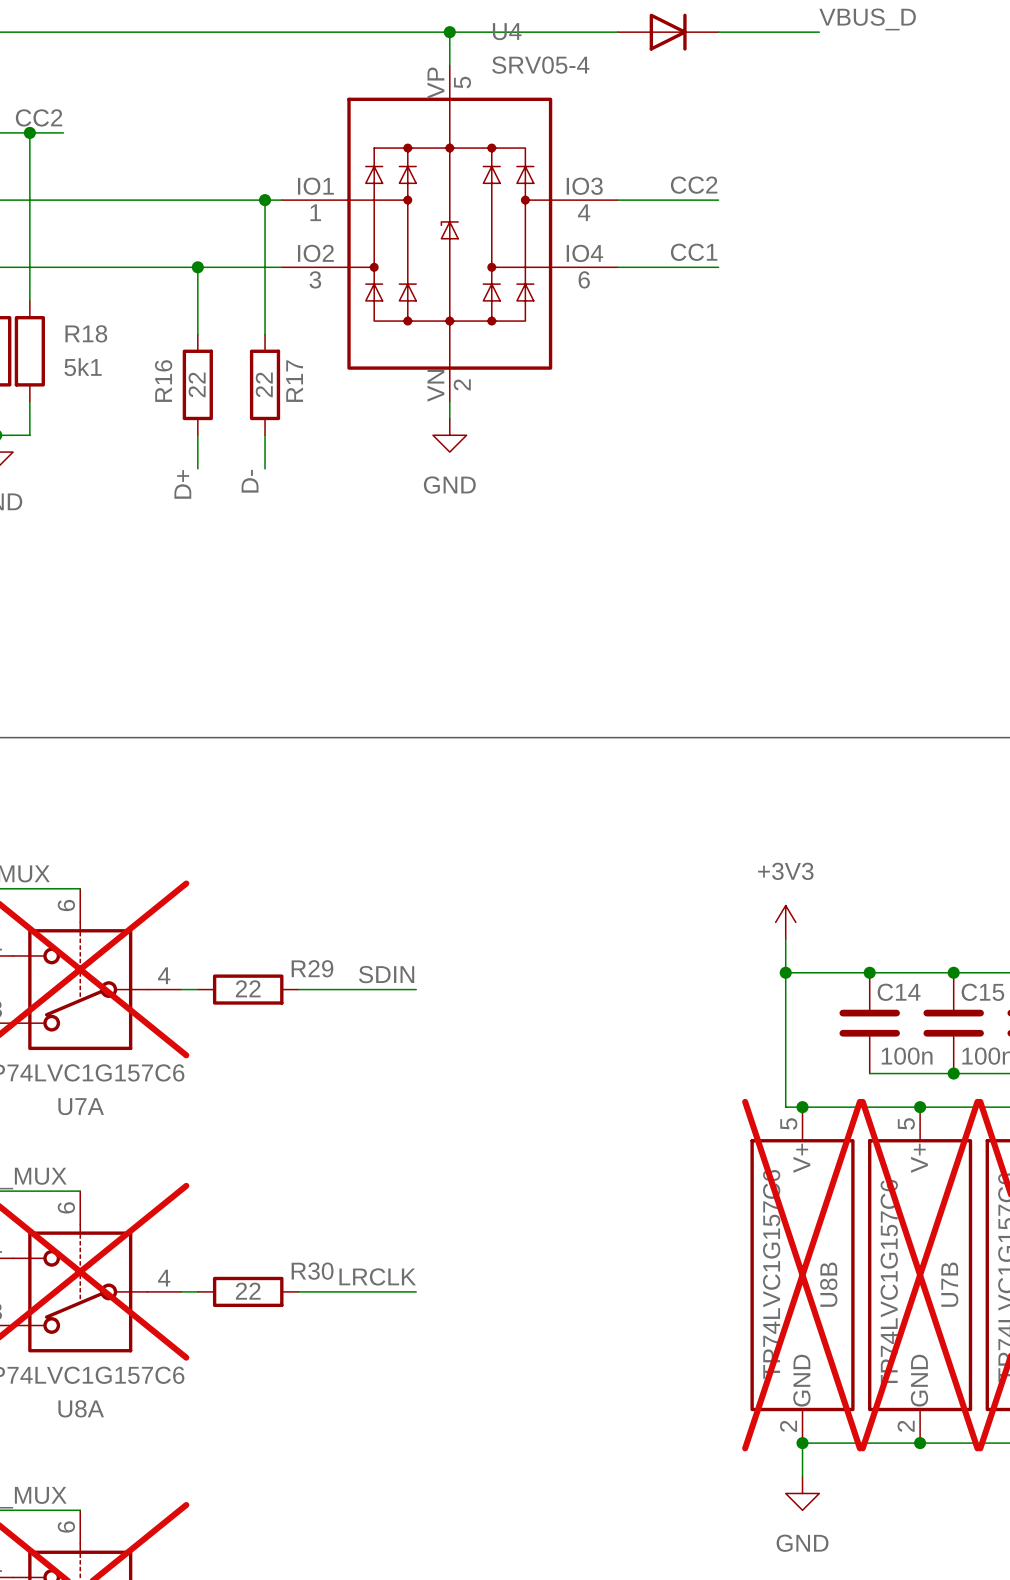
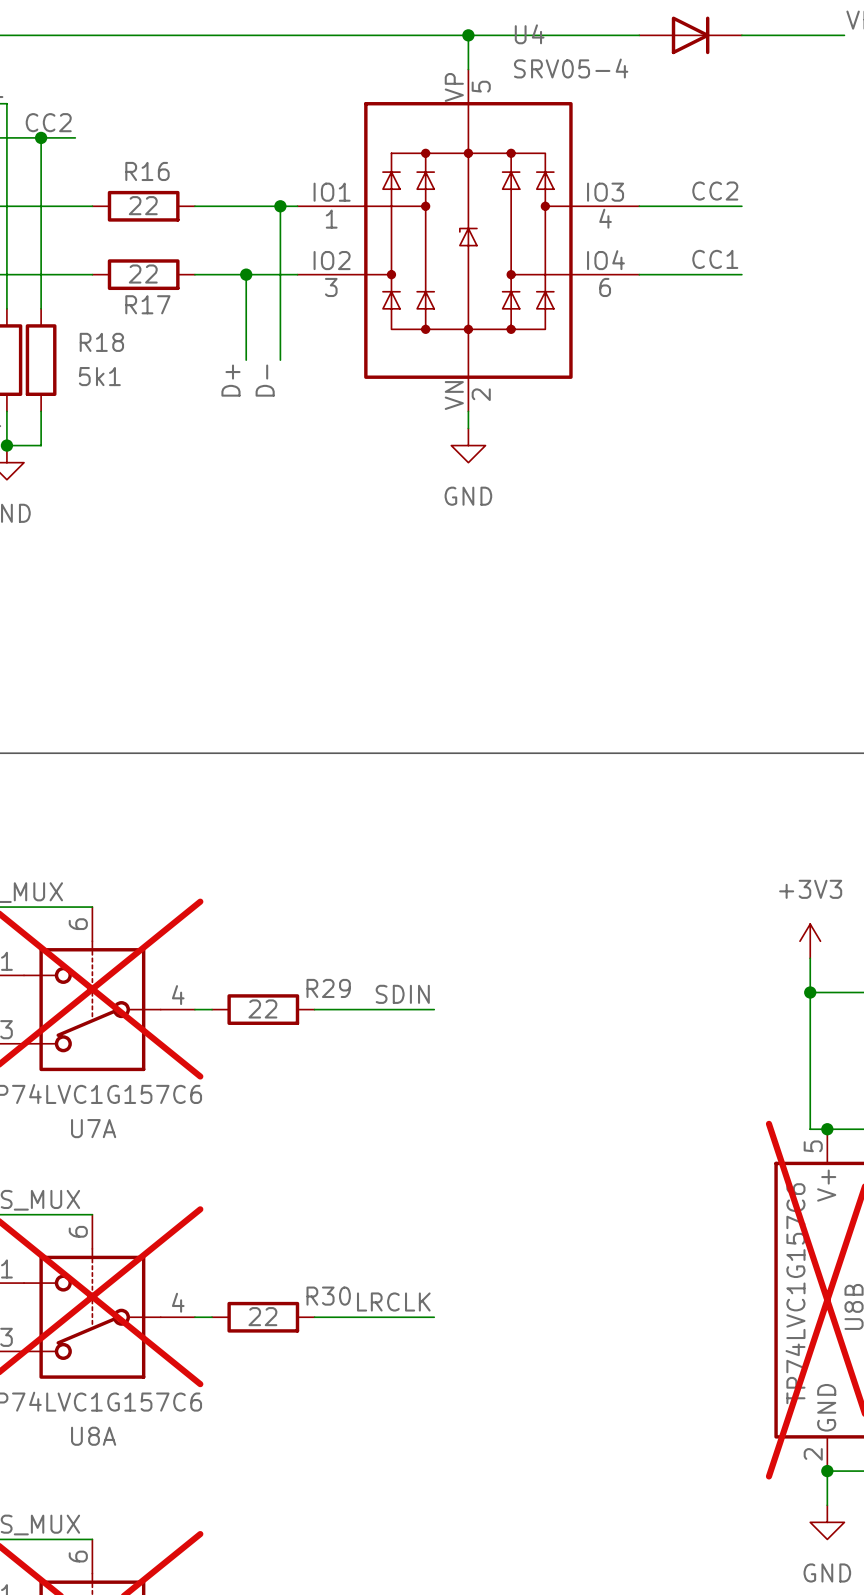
wire: (80, 200) (181, 200) -> none
wire: (80, 267) (181, 267) -> none
wire: (197, 267) (197, 334) -> none
junction position: (197, 267) -> (246, 274)
wire: none -> (246, 274) (246, 360)
R16 rotation: 0° (197, 384) -> 90° clockwise (143, 206)
R16 position: (197, 384) -> (143, 206)
R17 rotation: 0° (265, 384) -> 90° clockwise (143, 274)
R17 position: (265, 384) -> (143, 274)
wire: (197, 435) (197, 468) -> none
wire: (265, 435) (265, 468) -> none
label position: D- (250, 481) -> D- (265, 380)
label position: D+ (182, 484) -> D+ (230, 380)

